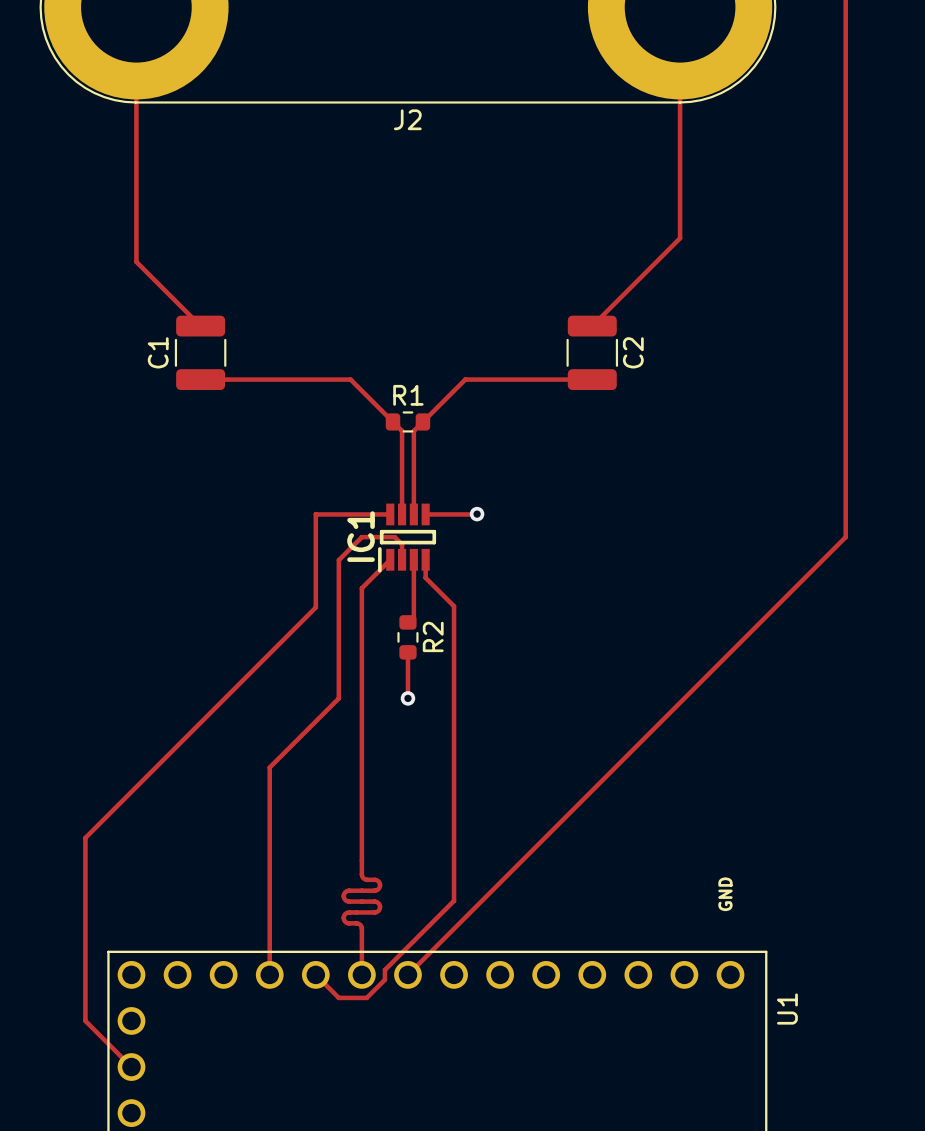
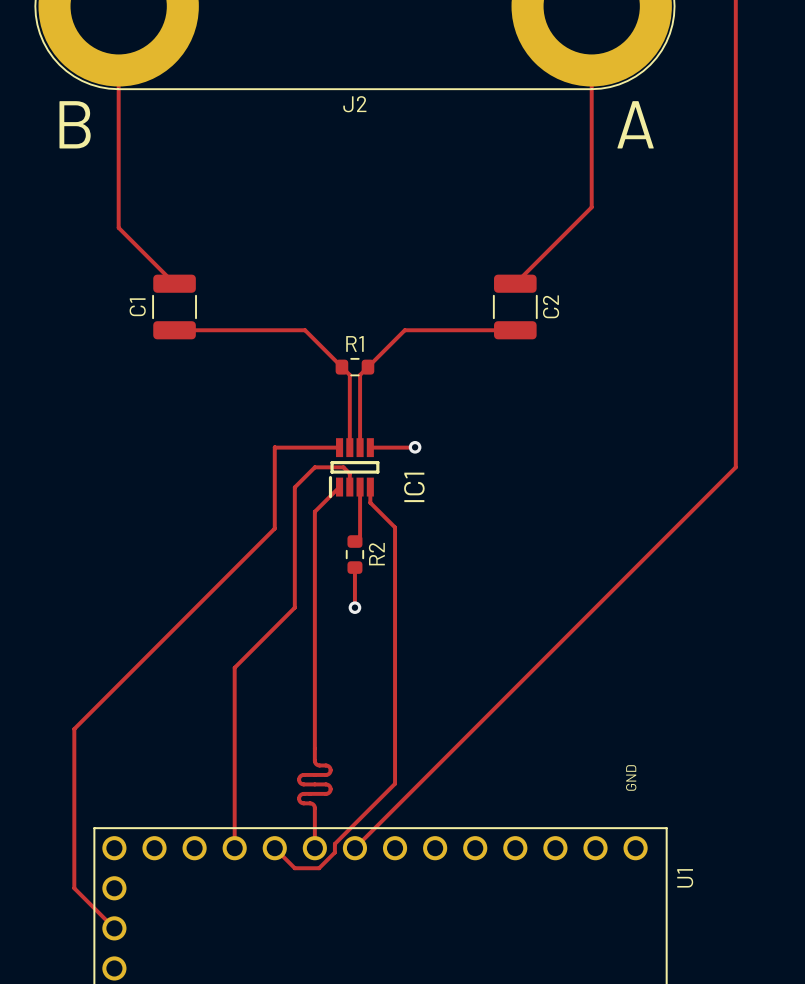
text: none -> B (75, 124)
text: none -> A (635, 124)
IC1 name position: IC1 (361, 536) -> IC1 (414, 487)

